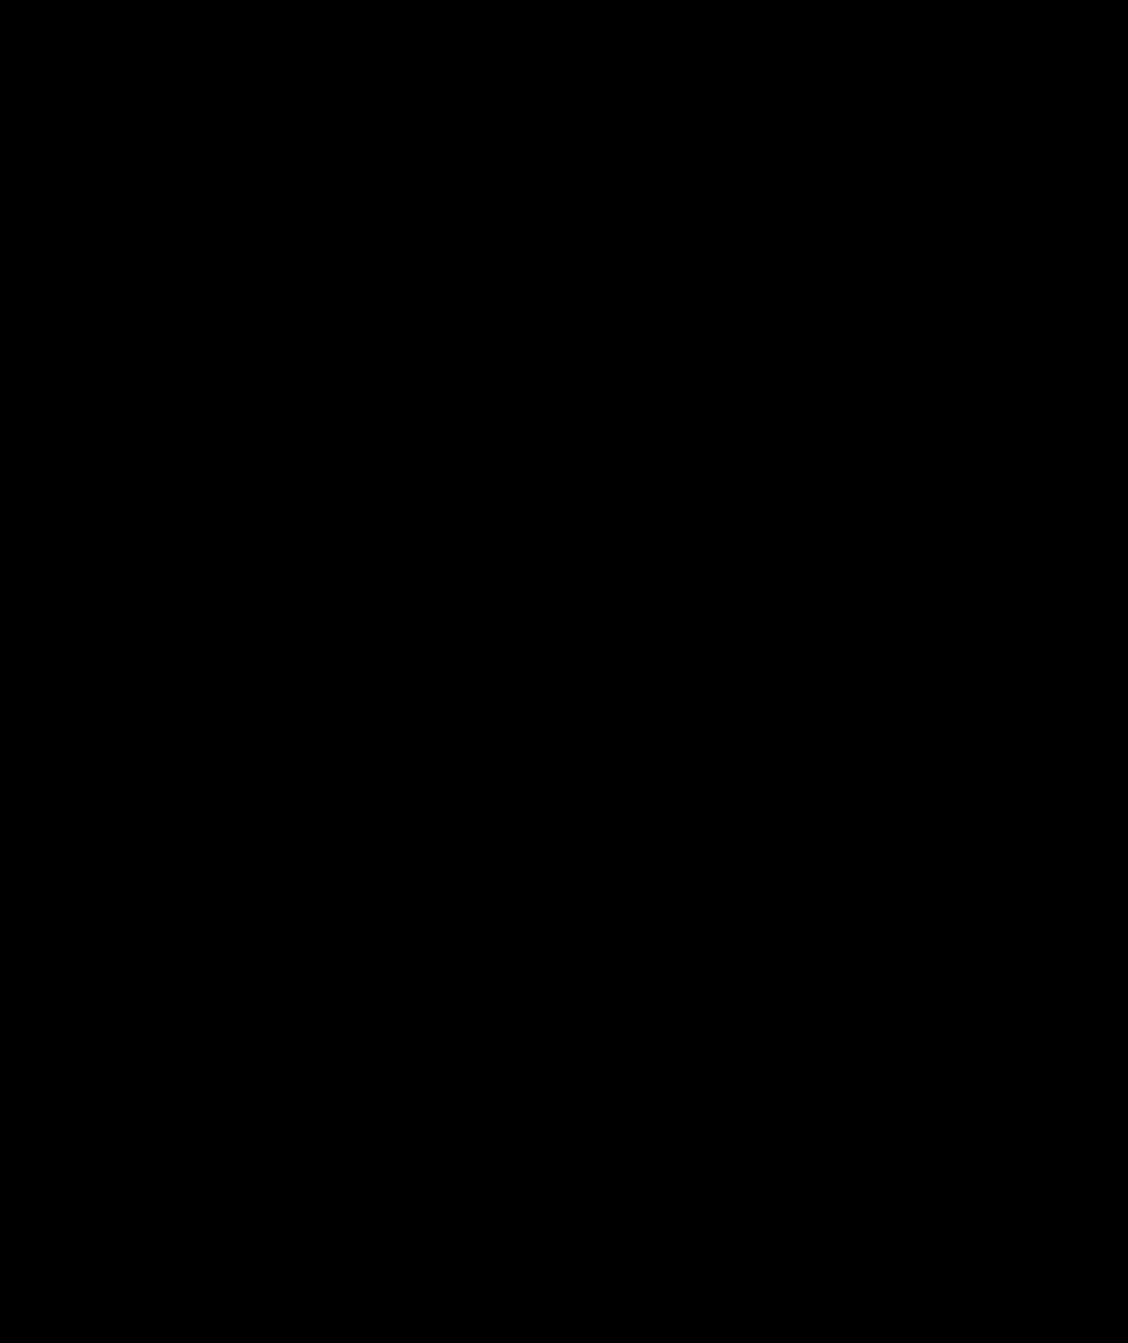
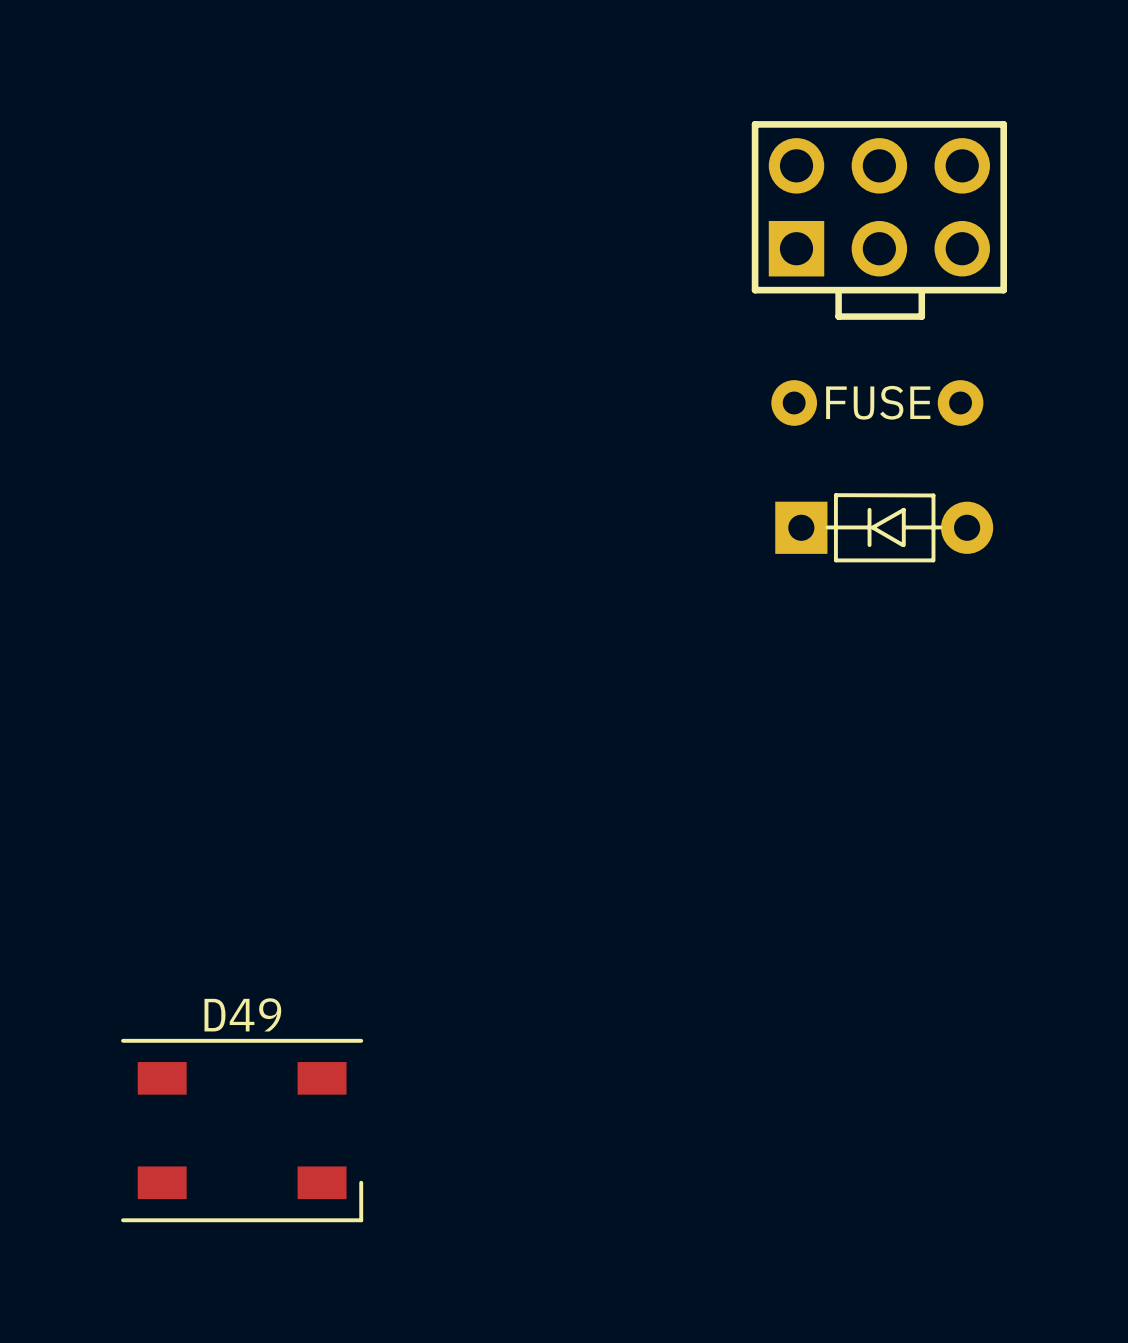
part: none -> (879, 220)
part: none -> (877, 402)
part: none -> (884, 527)
D49: none -> (242, 1130)

